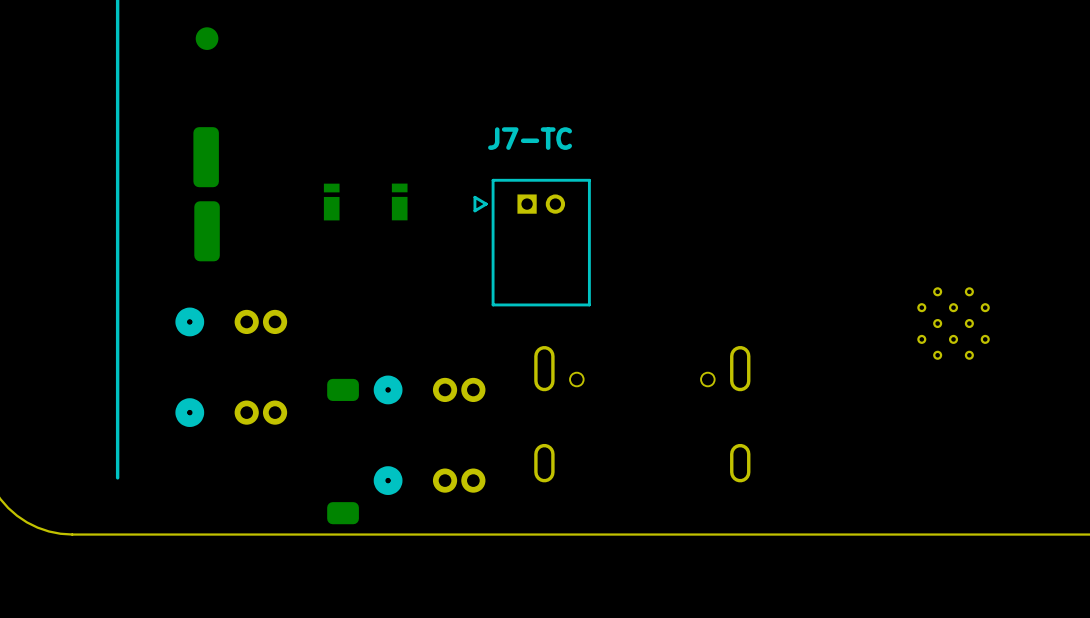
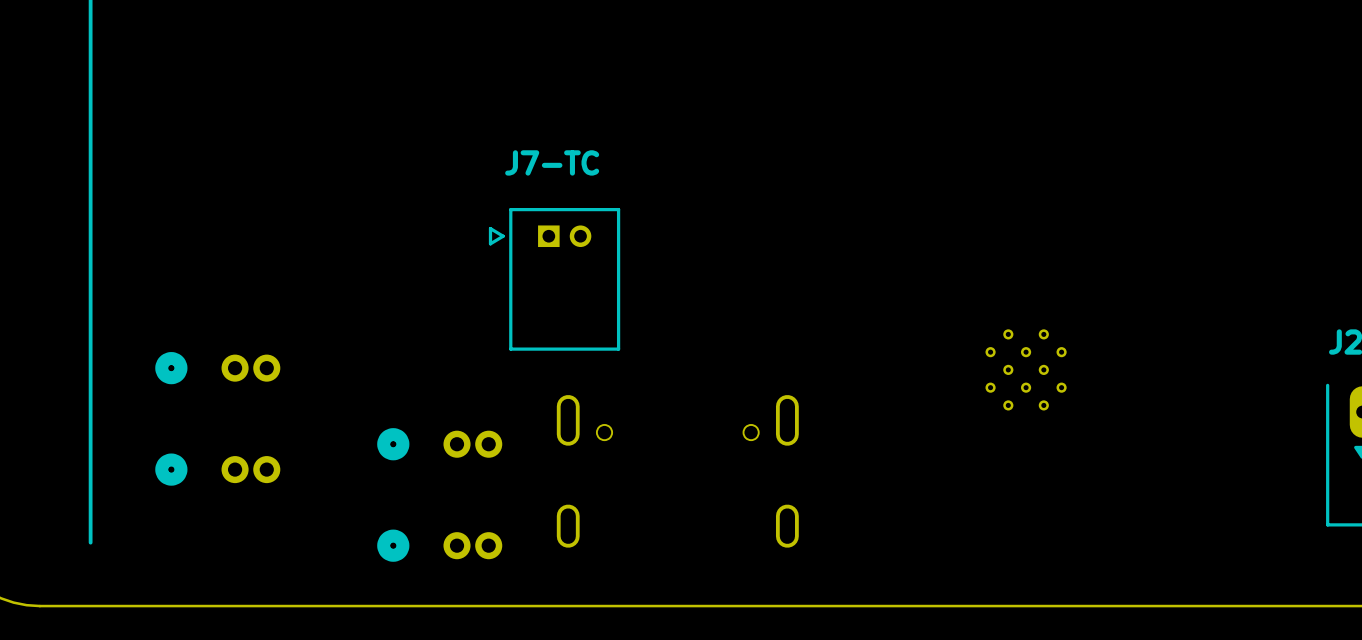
part: (207, 38) -> none
part: (206, 157) -> none
part: (399, 201) -> none
part: (331, 202) -> none
part: (207, 231) -> none
part: (343, 389) -> none
part: (343, 513) -> none

